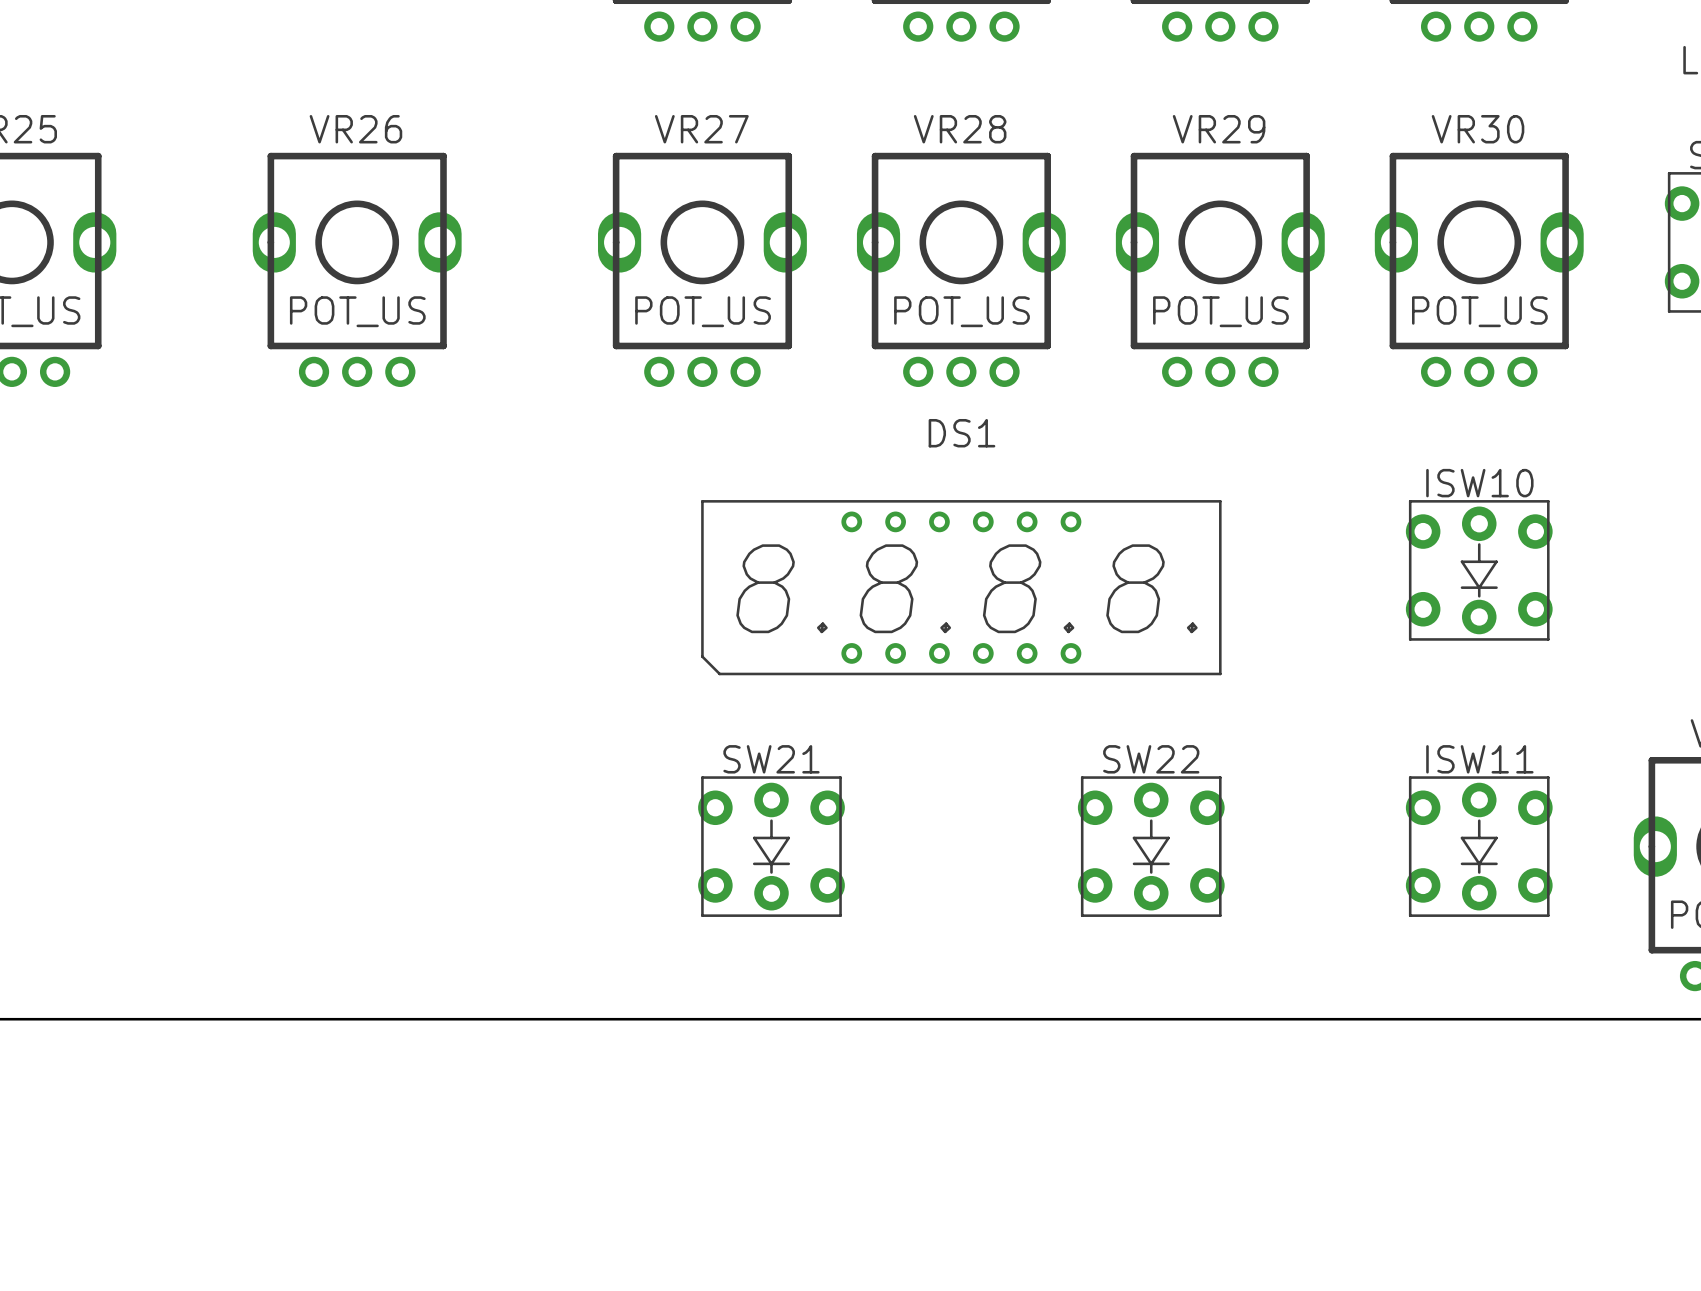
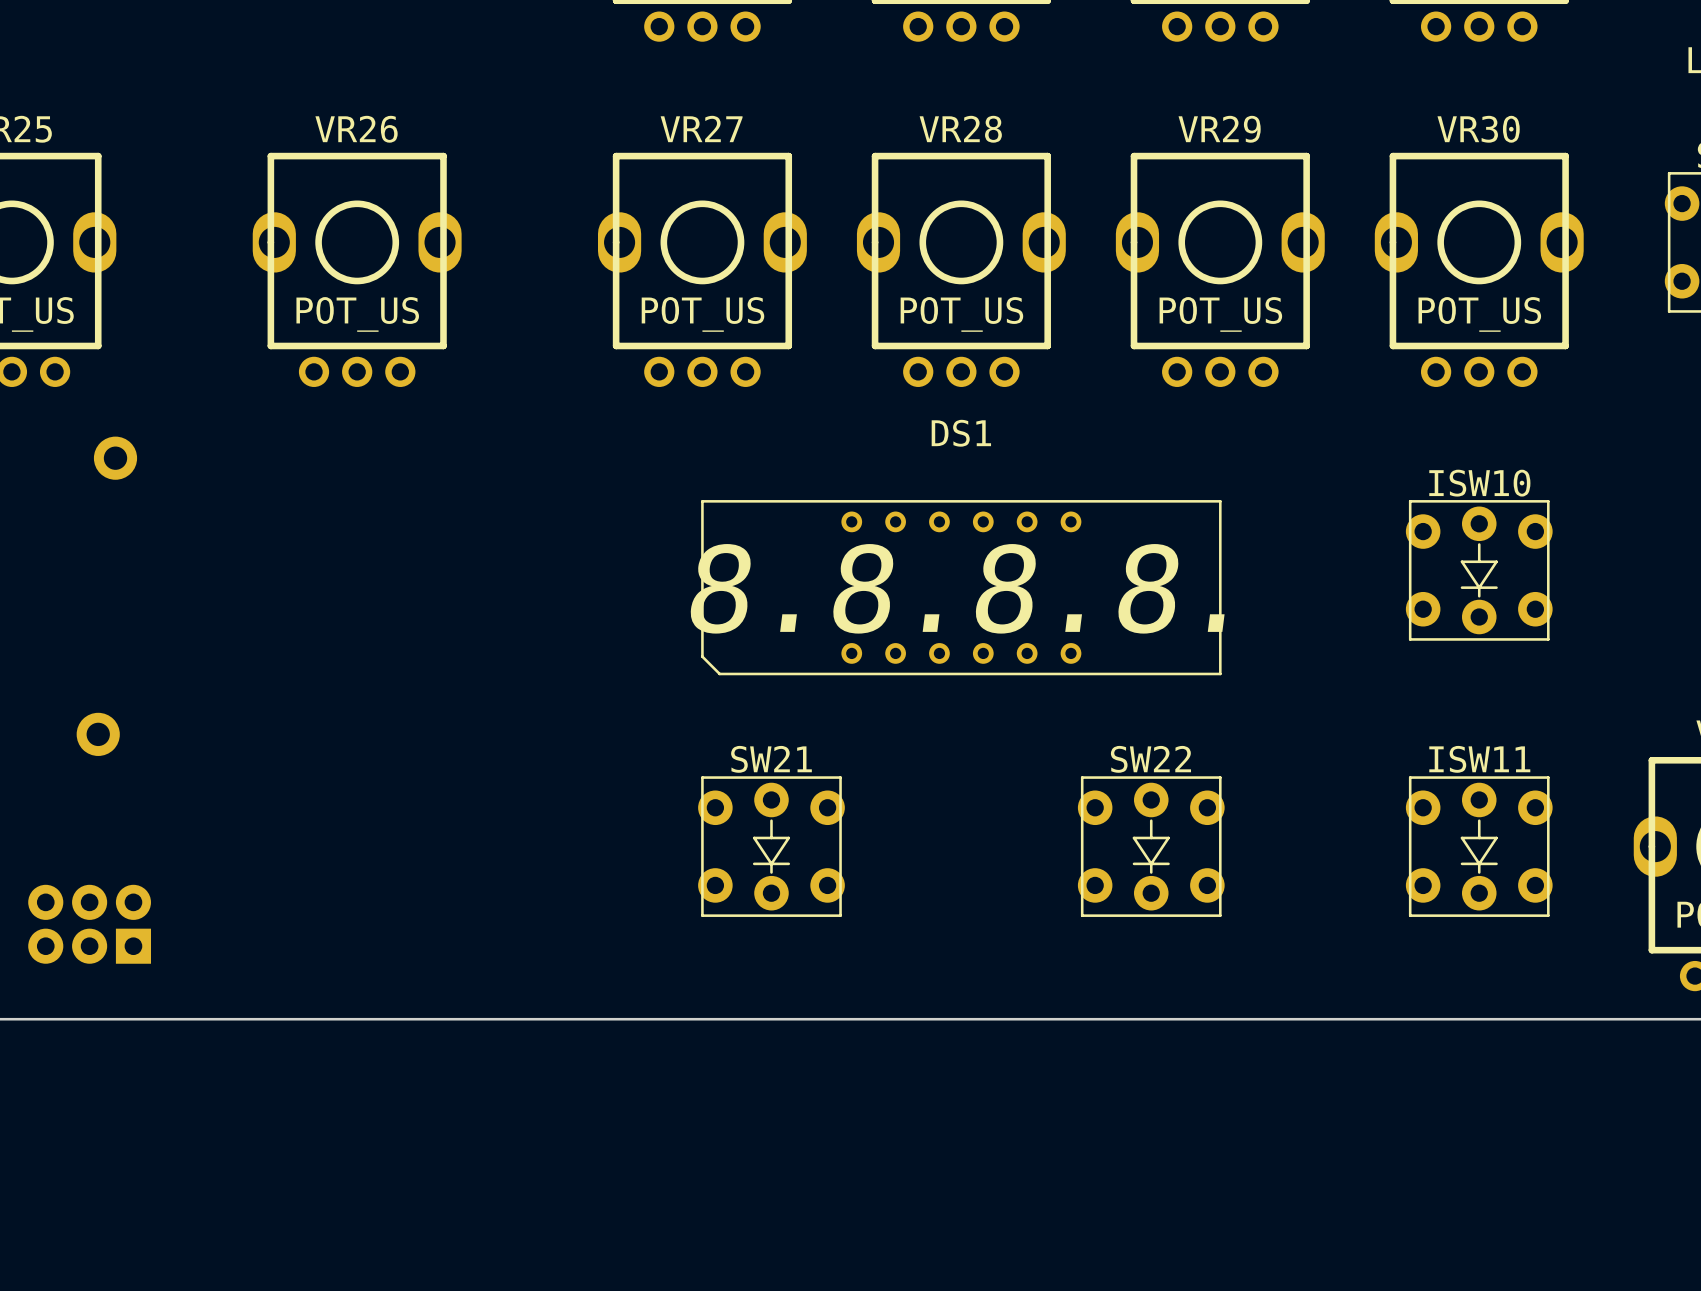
part: none -> (115, 458)
part: none -> (98, 734)
part: none -> (89, 924)

